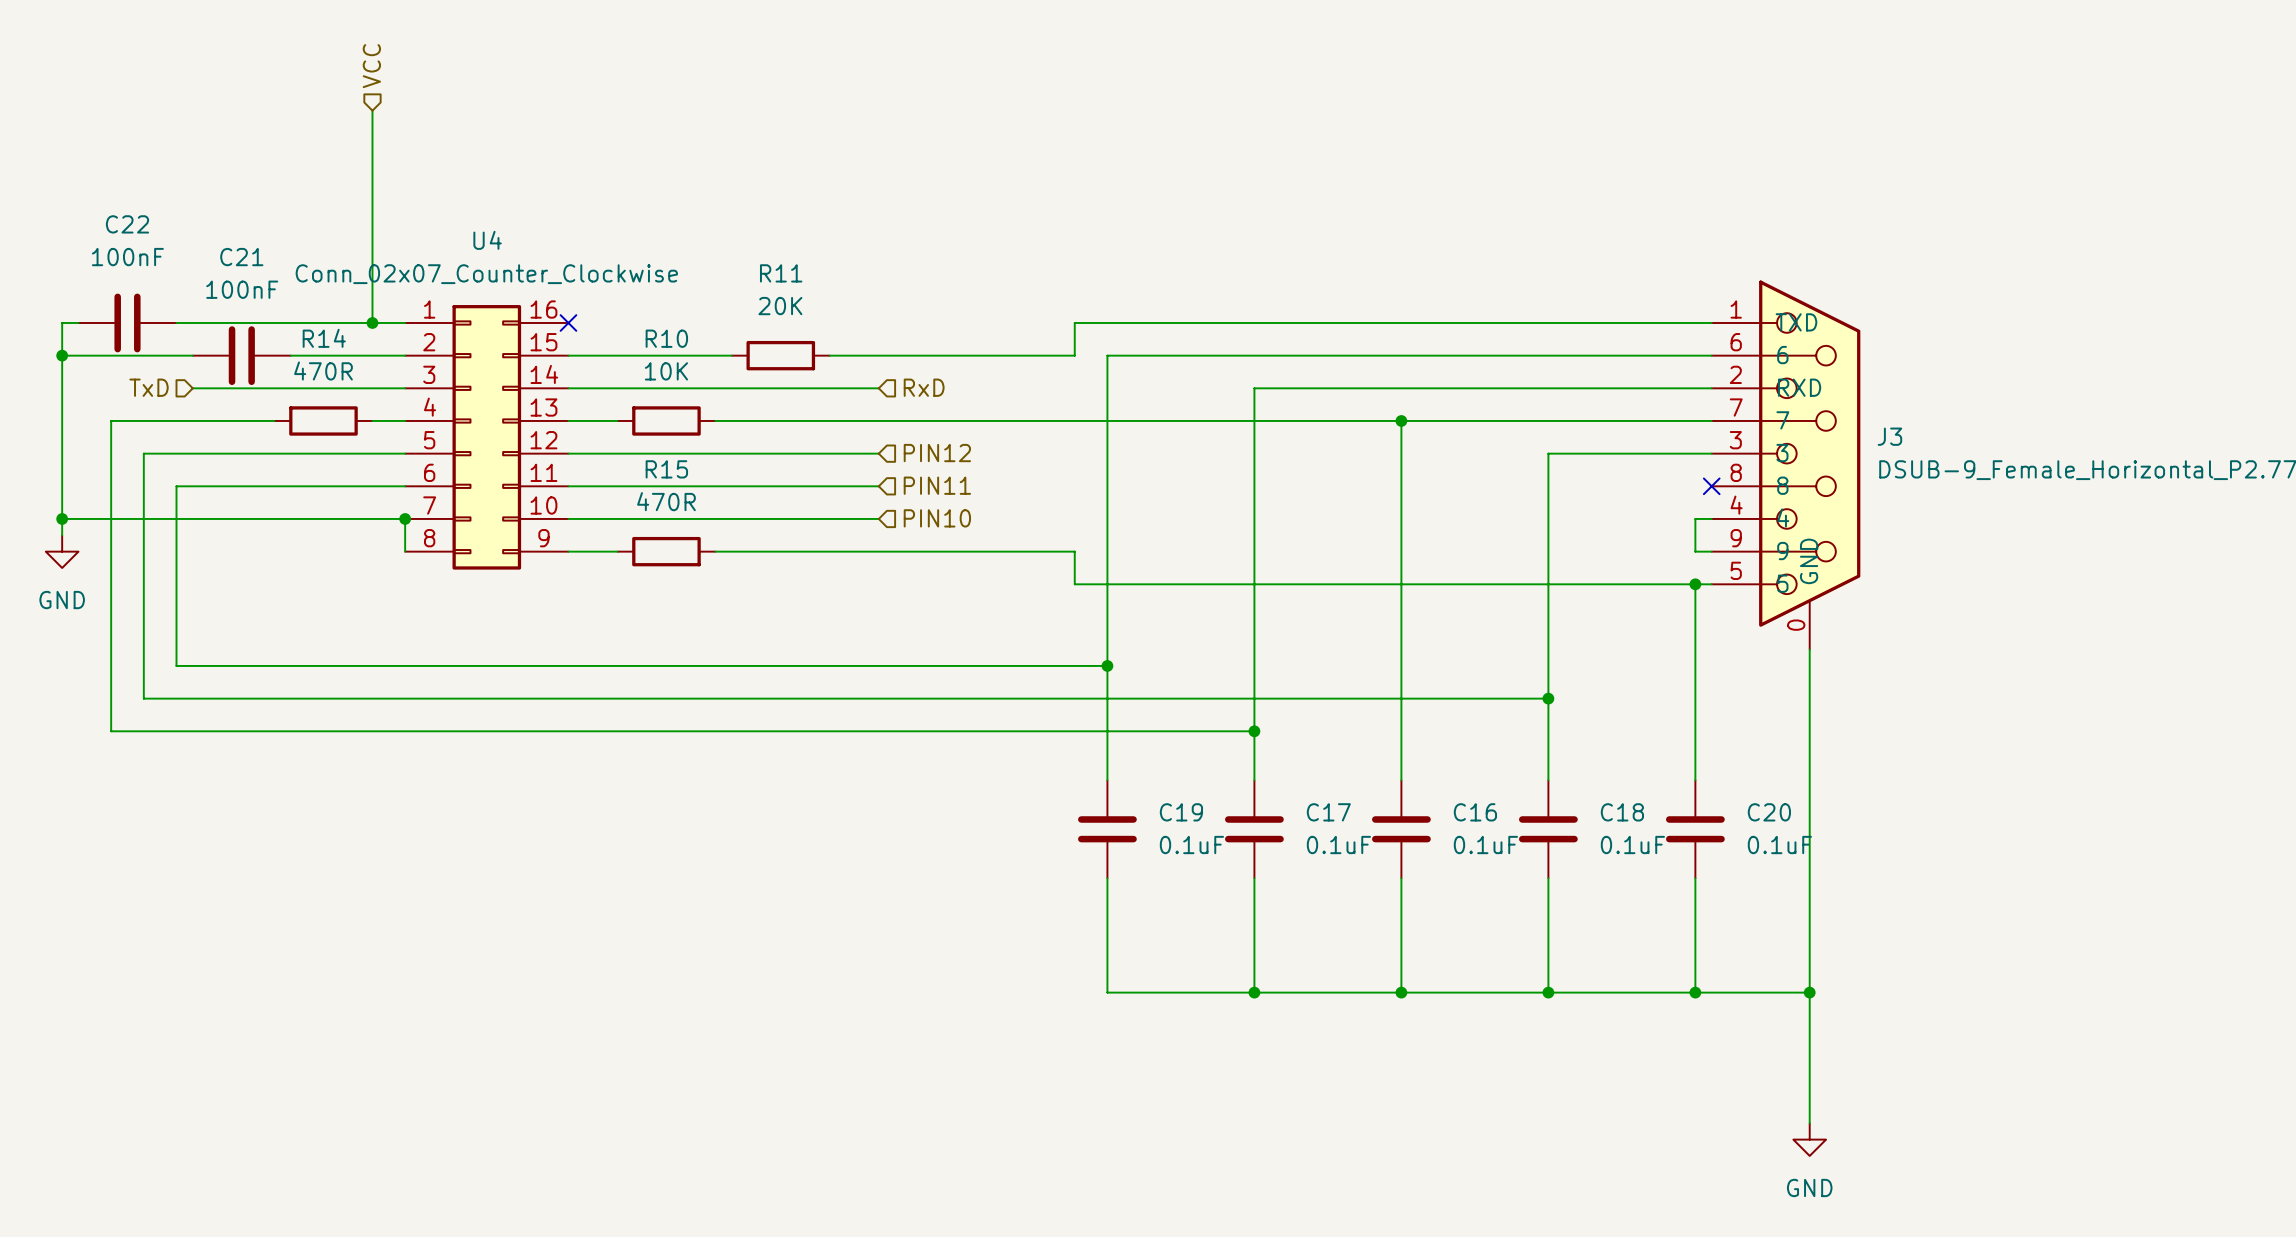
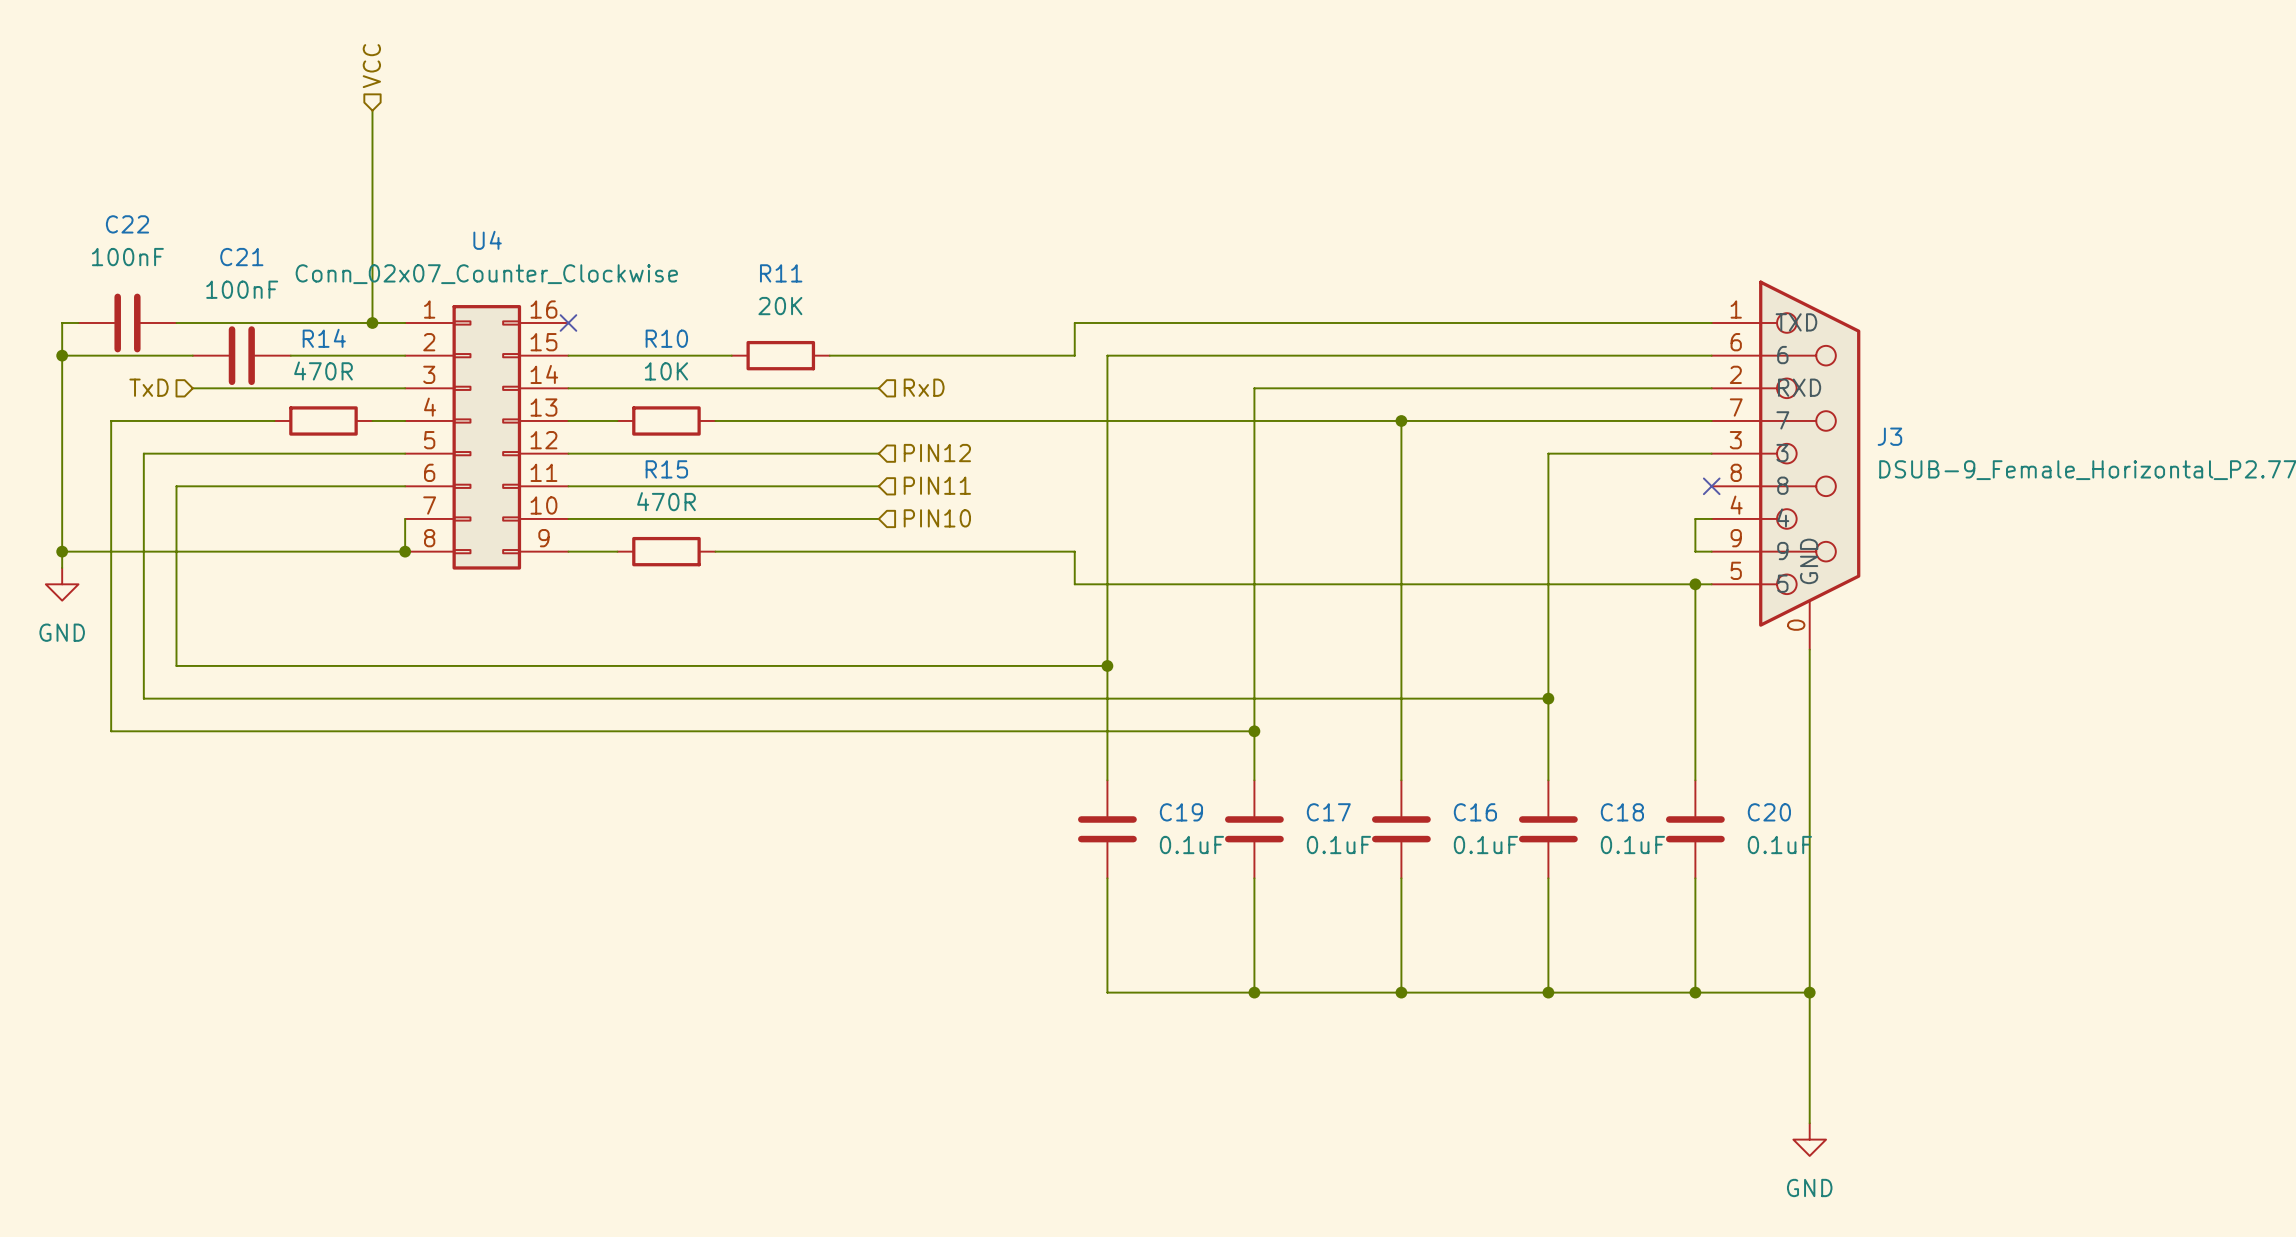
wire: (62, 518) (405, 518) -> (62, 551) (405, 551)
junction position: (62, 518) -> (62, 551)
junction position: (405, 518) -> (405, 551)
power symbol position: GND (62, 551) -> GND (62, 584)

